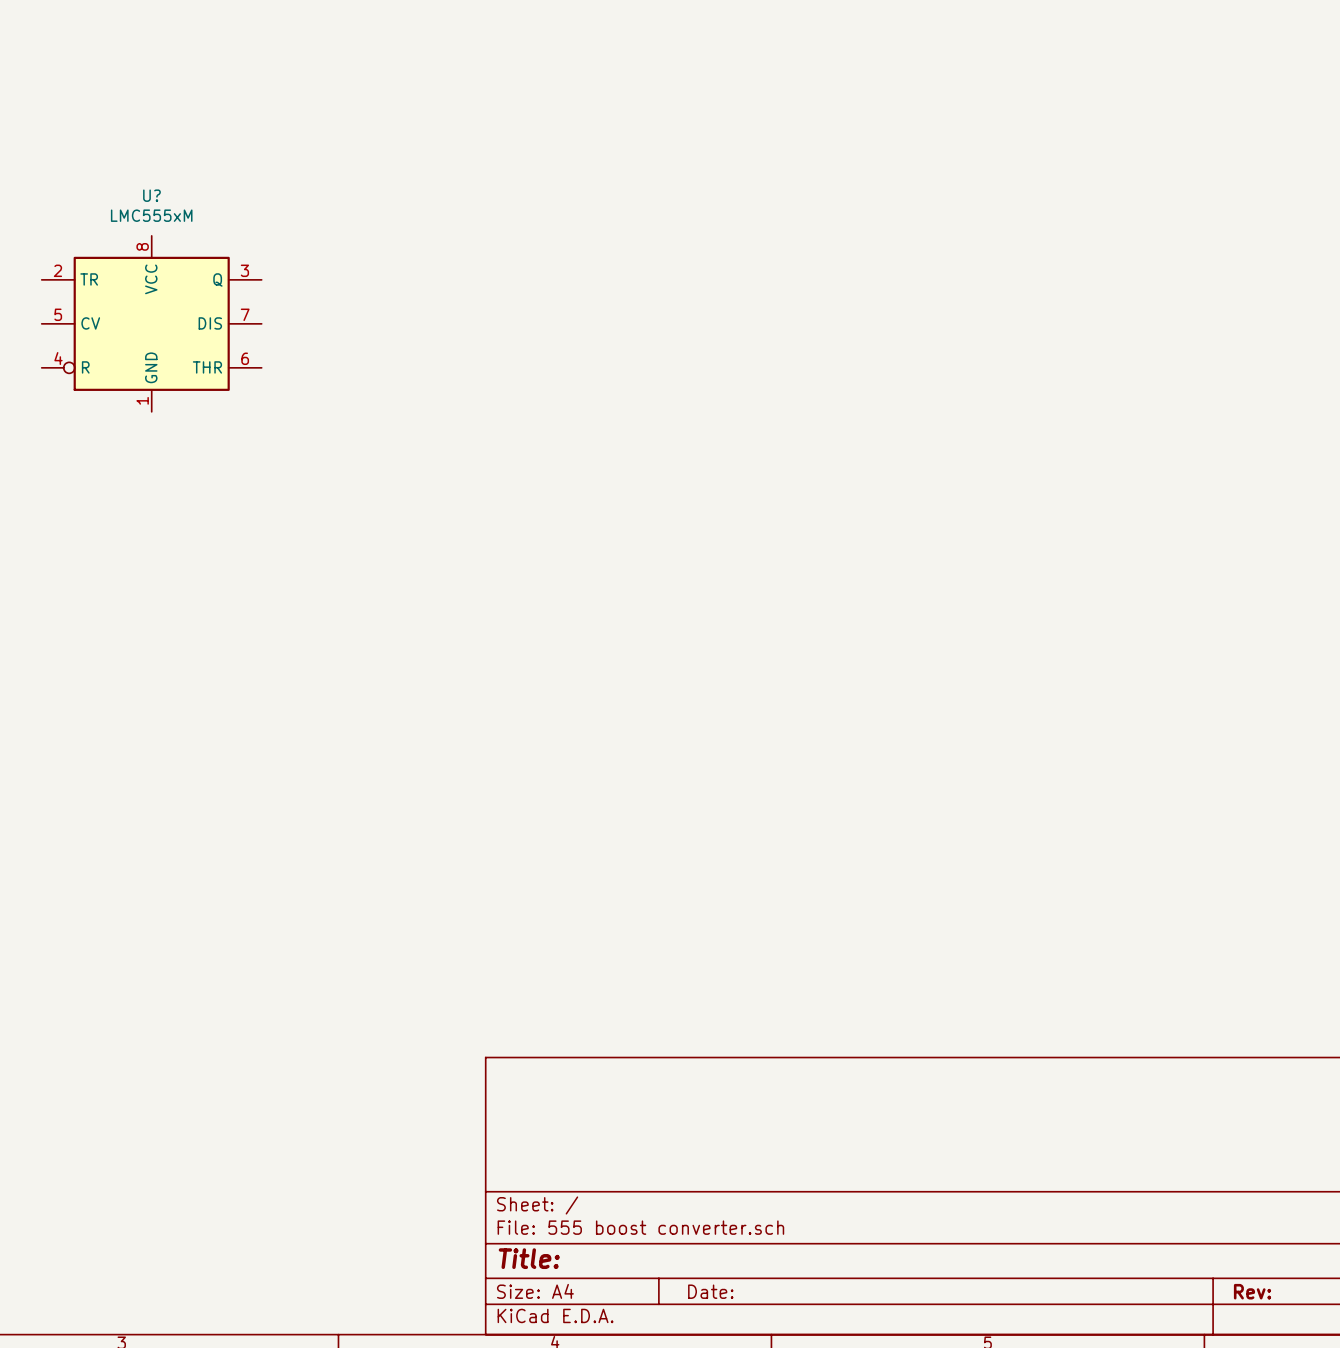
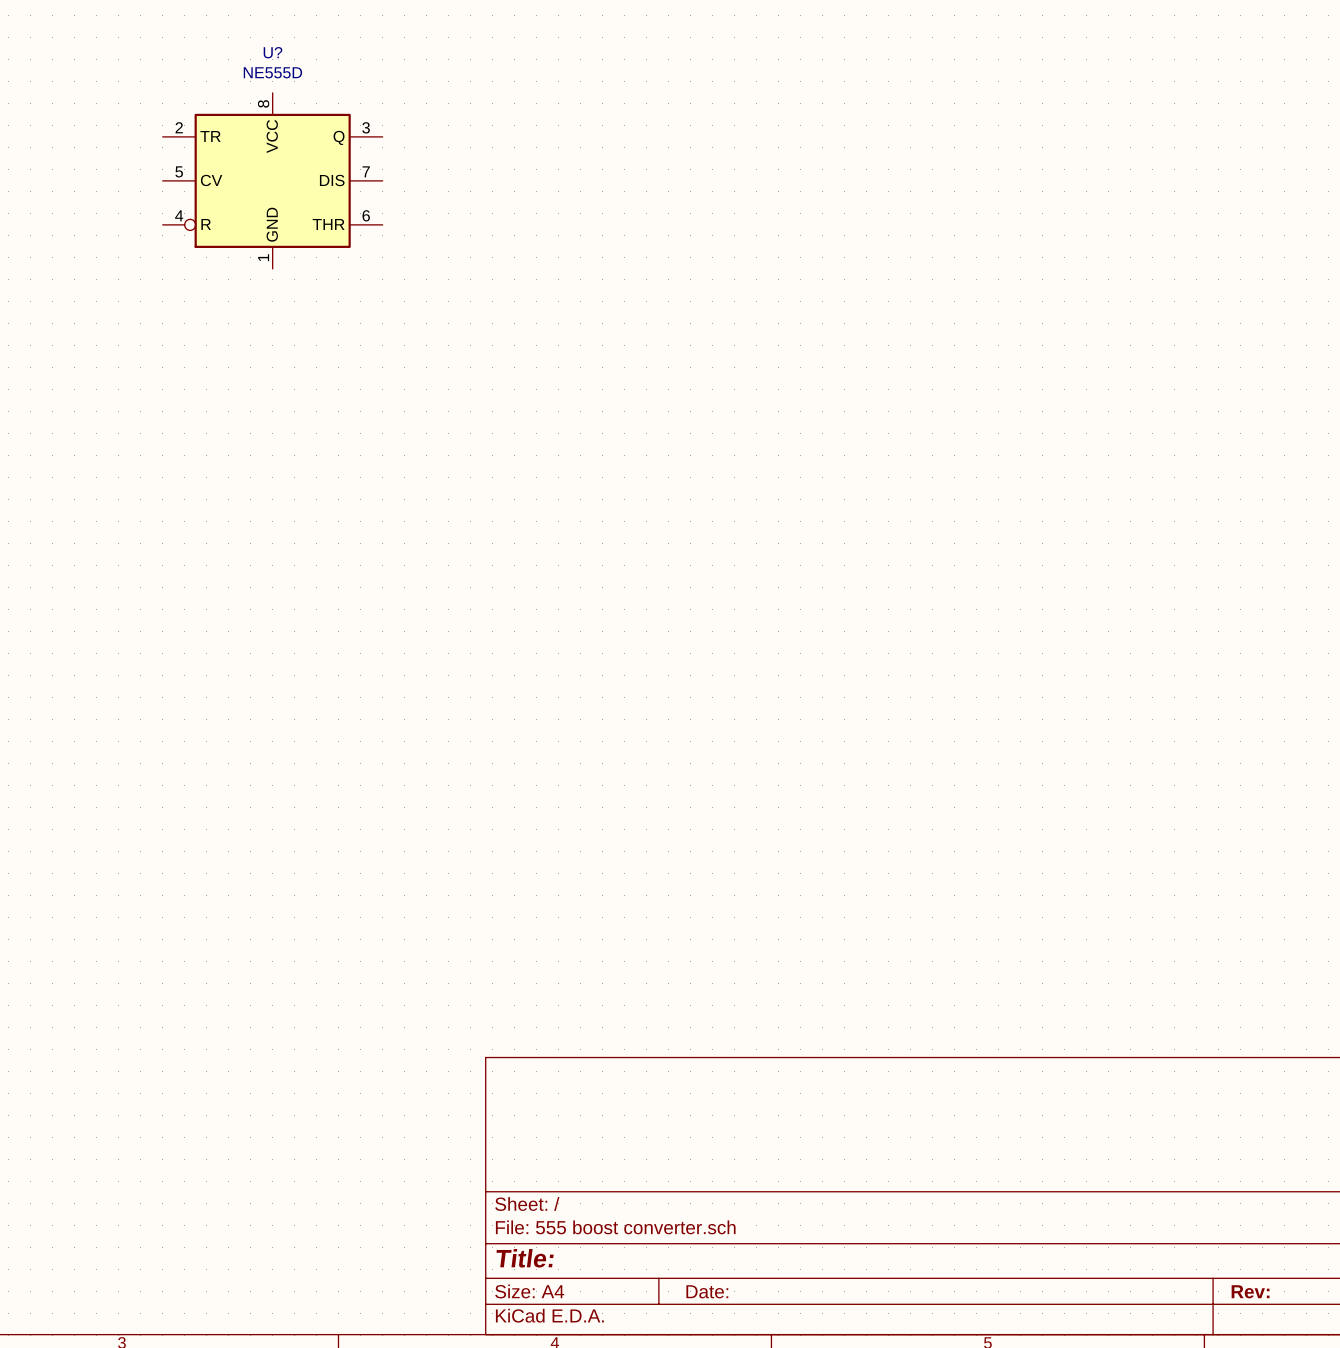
U?: none -> NE555D (272, 180)
U?: LMC555xM (151, 323) -> none

